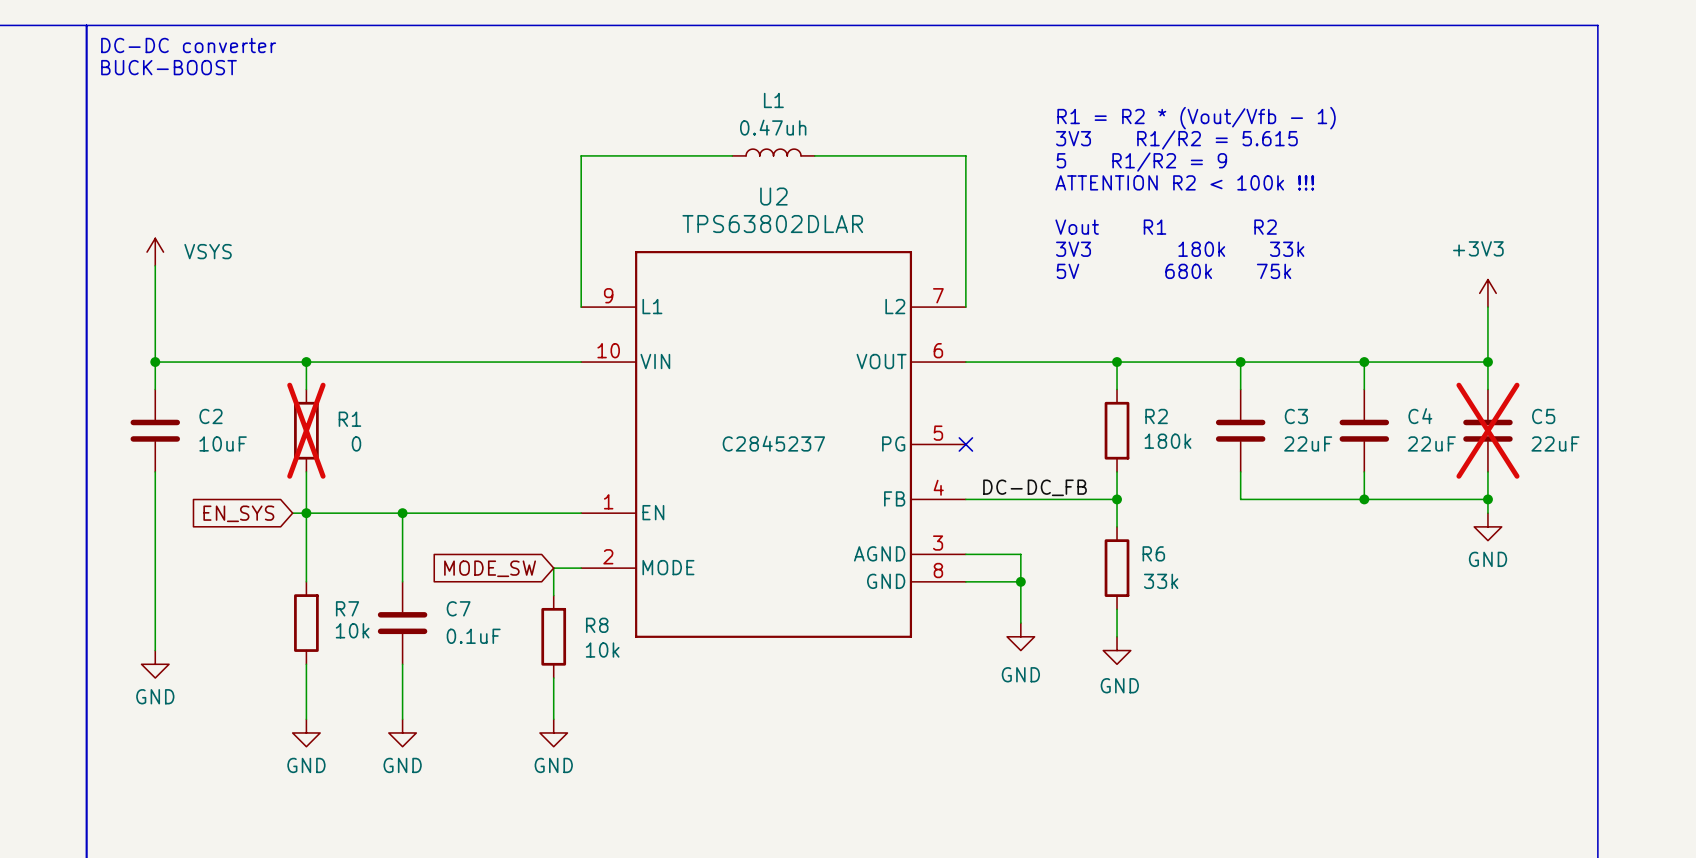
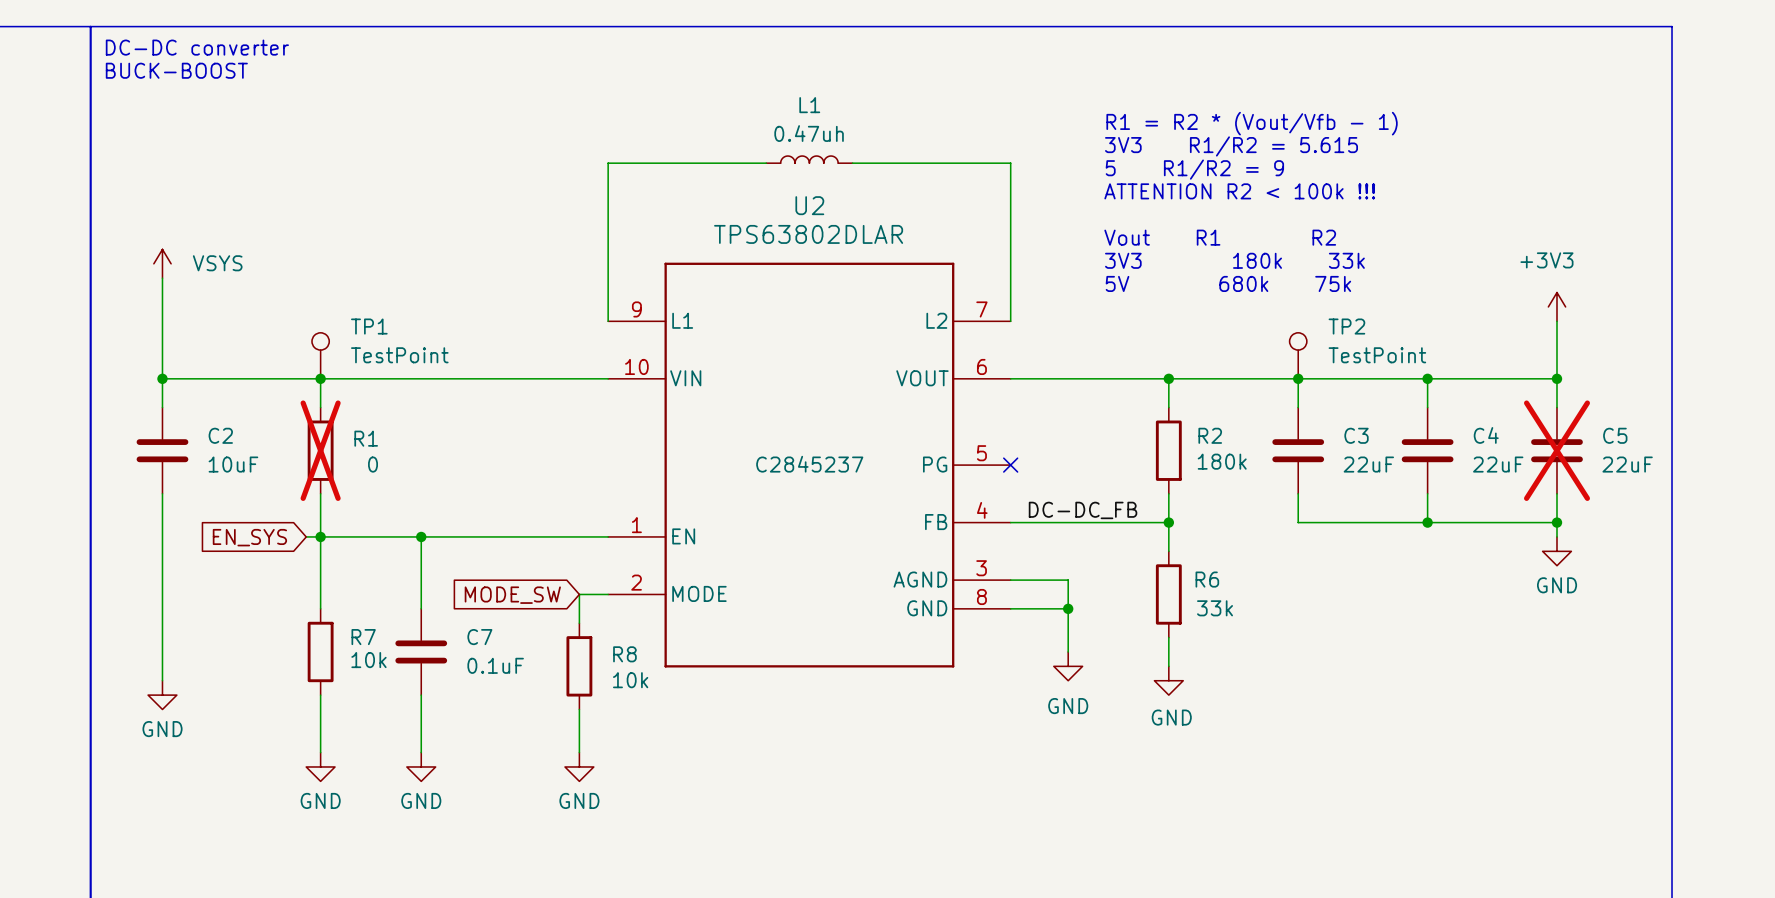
TP1: none -> TestPoint (320, 355)
TP2: none -> TestPoint (1298, 355)

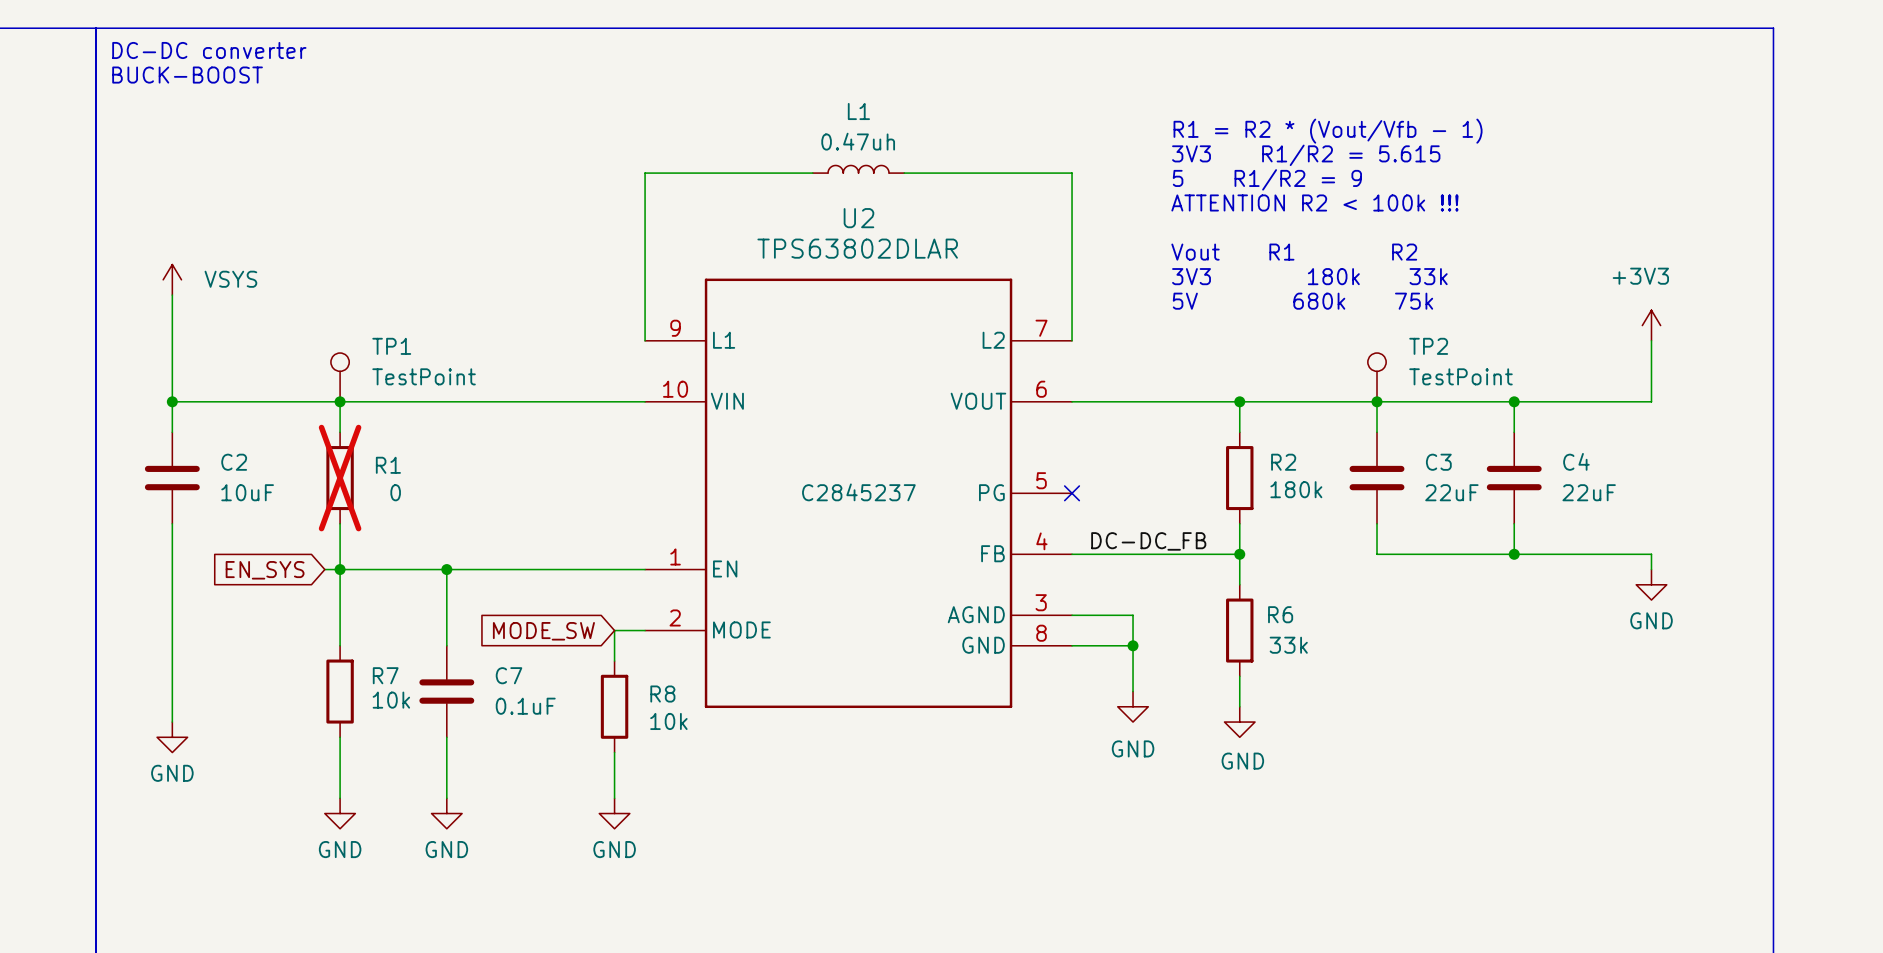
wire: (1556, 378) (1556, 407) -> none
junction: (1556, 378) -> none
C5: 22uF (1556, 450) -> none
wire: (1556, 493) (1556, 522) -> none
junction: (1556, 522) -> none

